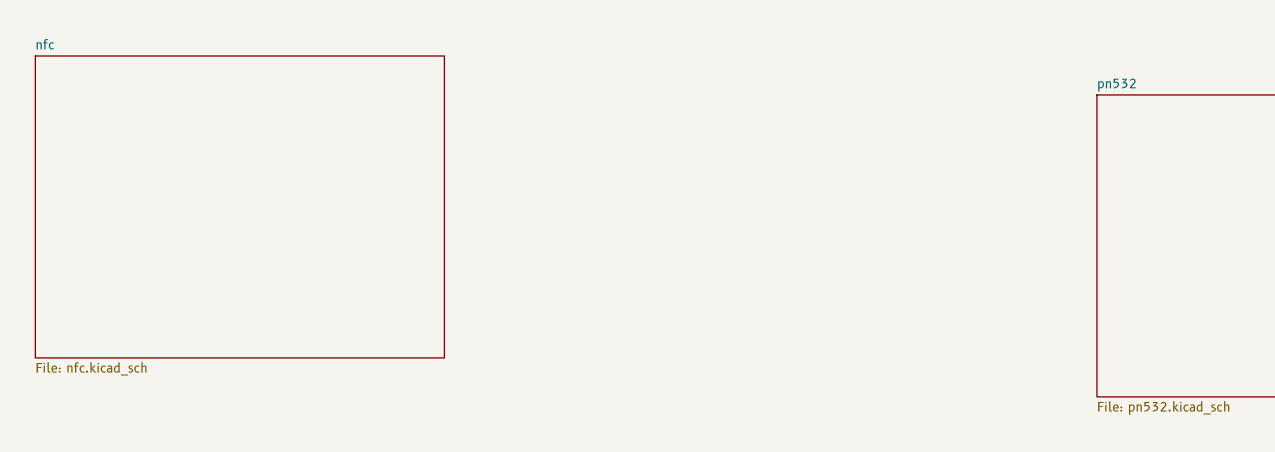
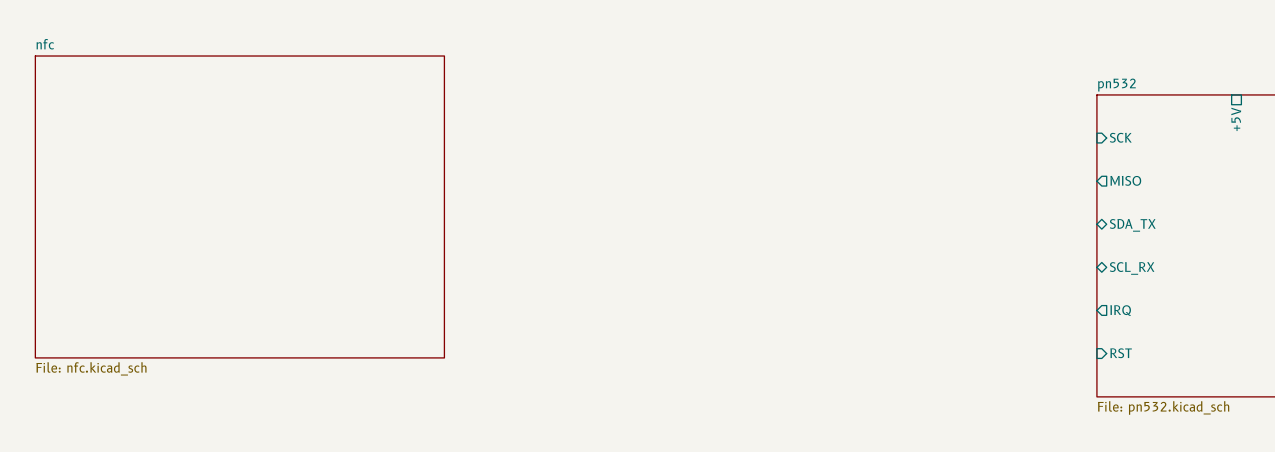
sheet pin: none -> +5V (1236, 119)
sheet pin: none -> SCK (1120, 137)
sheet pin: none -> MISO (1125, 180)
sheet pin: none -> SDA_TX (1132, 225)
sheet pin: none -> SCL_RX (1132, 268)
sheet pin: none -> IRQ (1120, 310)
sheet pin: none -> RST (1121, 353)

